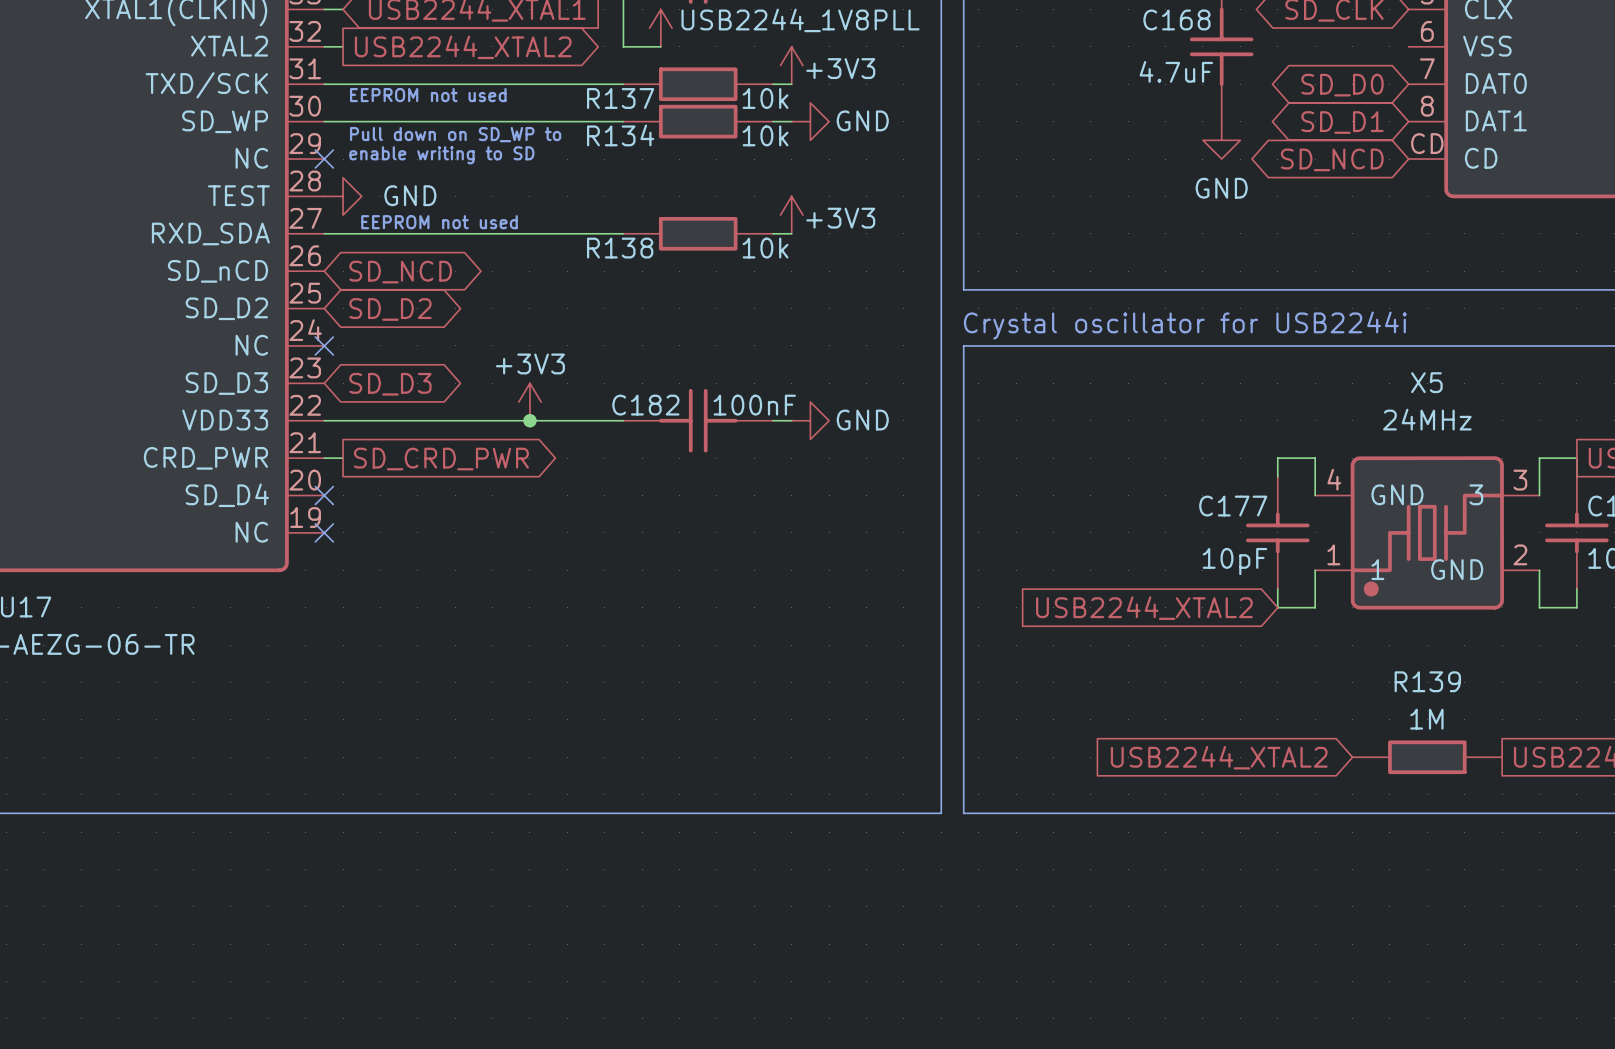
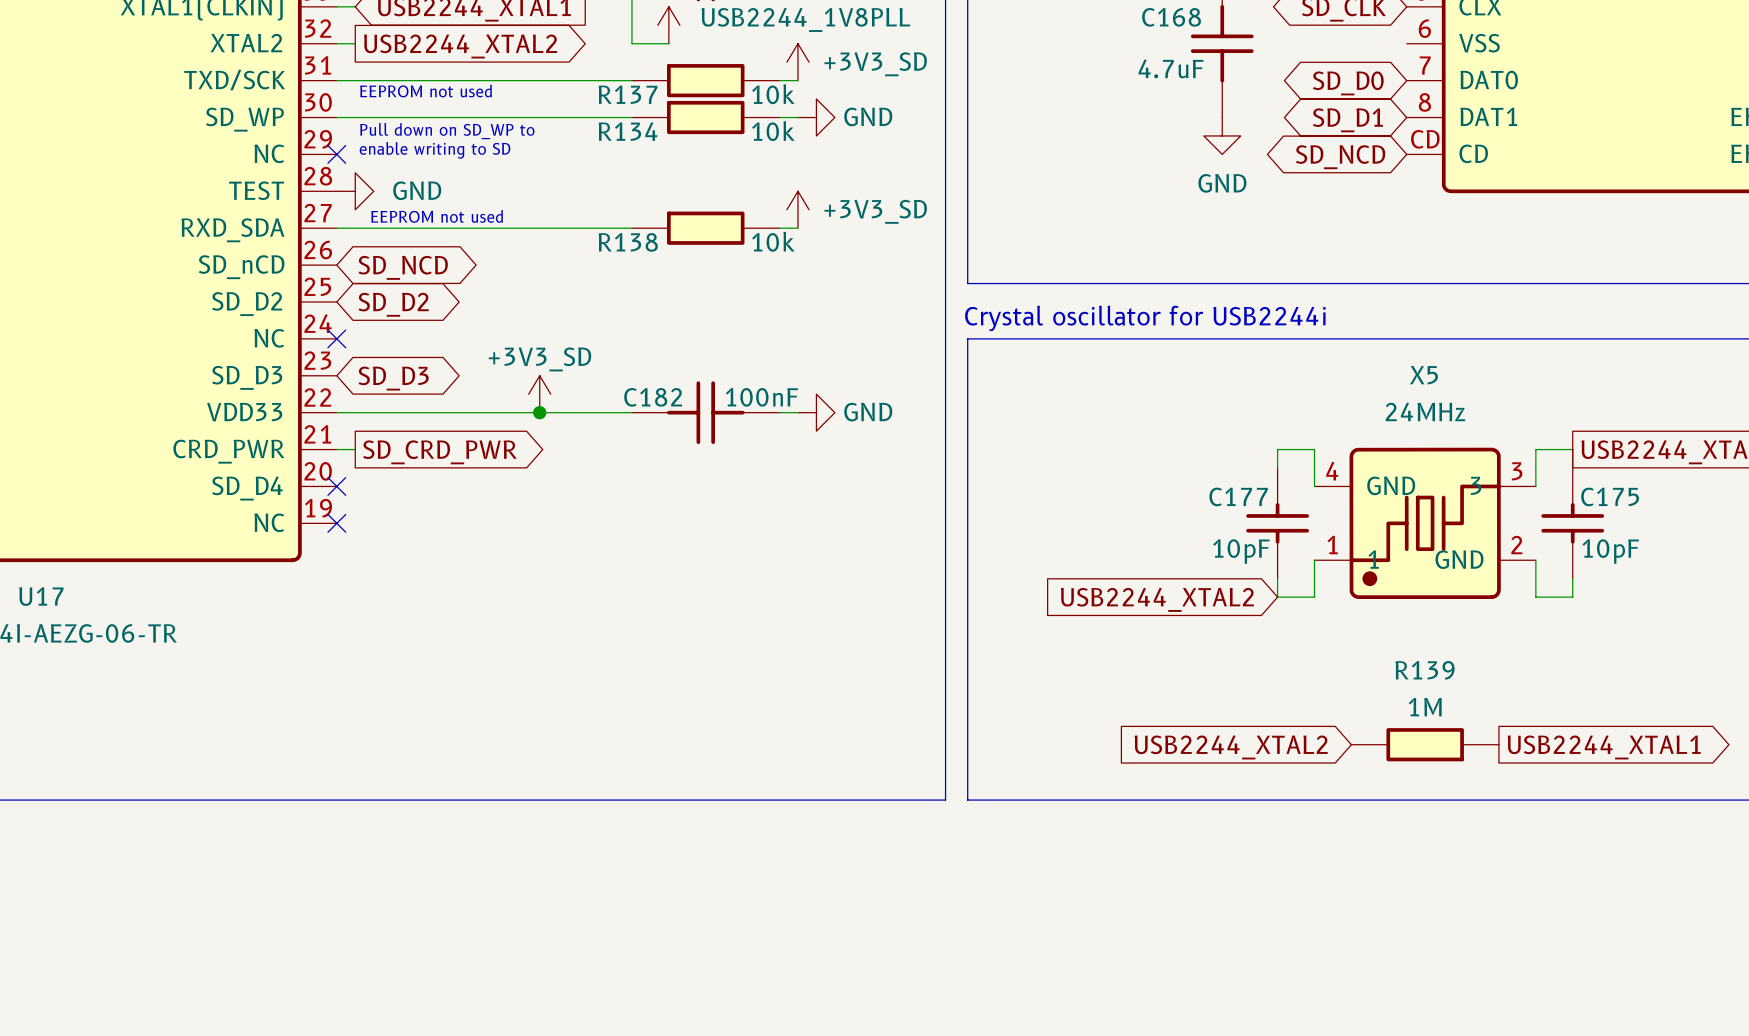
power symbol: +3V3 (791, 65) -> +3V3_SD (797, 62)
power symbol: +3V3 (791, 215) -> +3V3_SD (797, 209)
power symbol: +3V3 (529, 402) -> +3V3_SD (539, 394)

